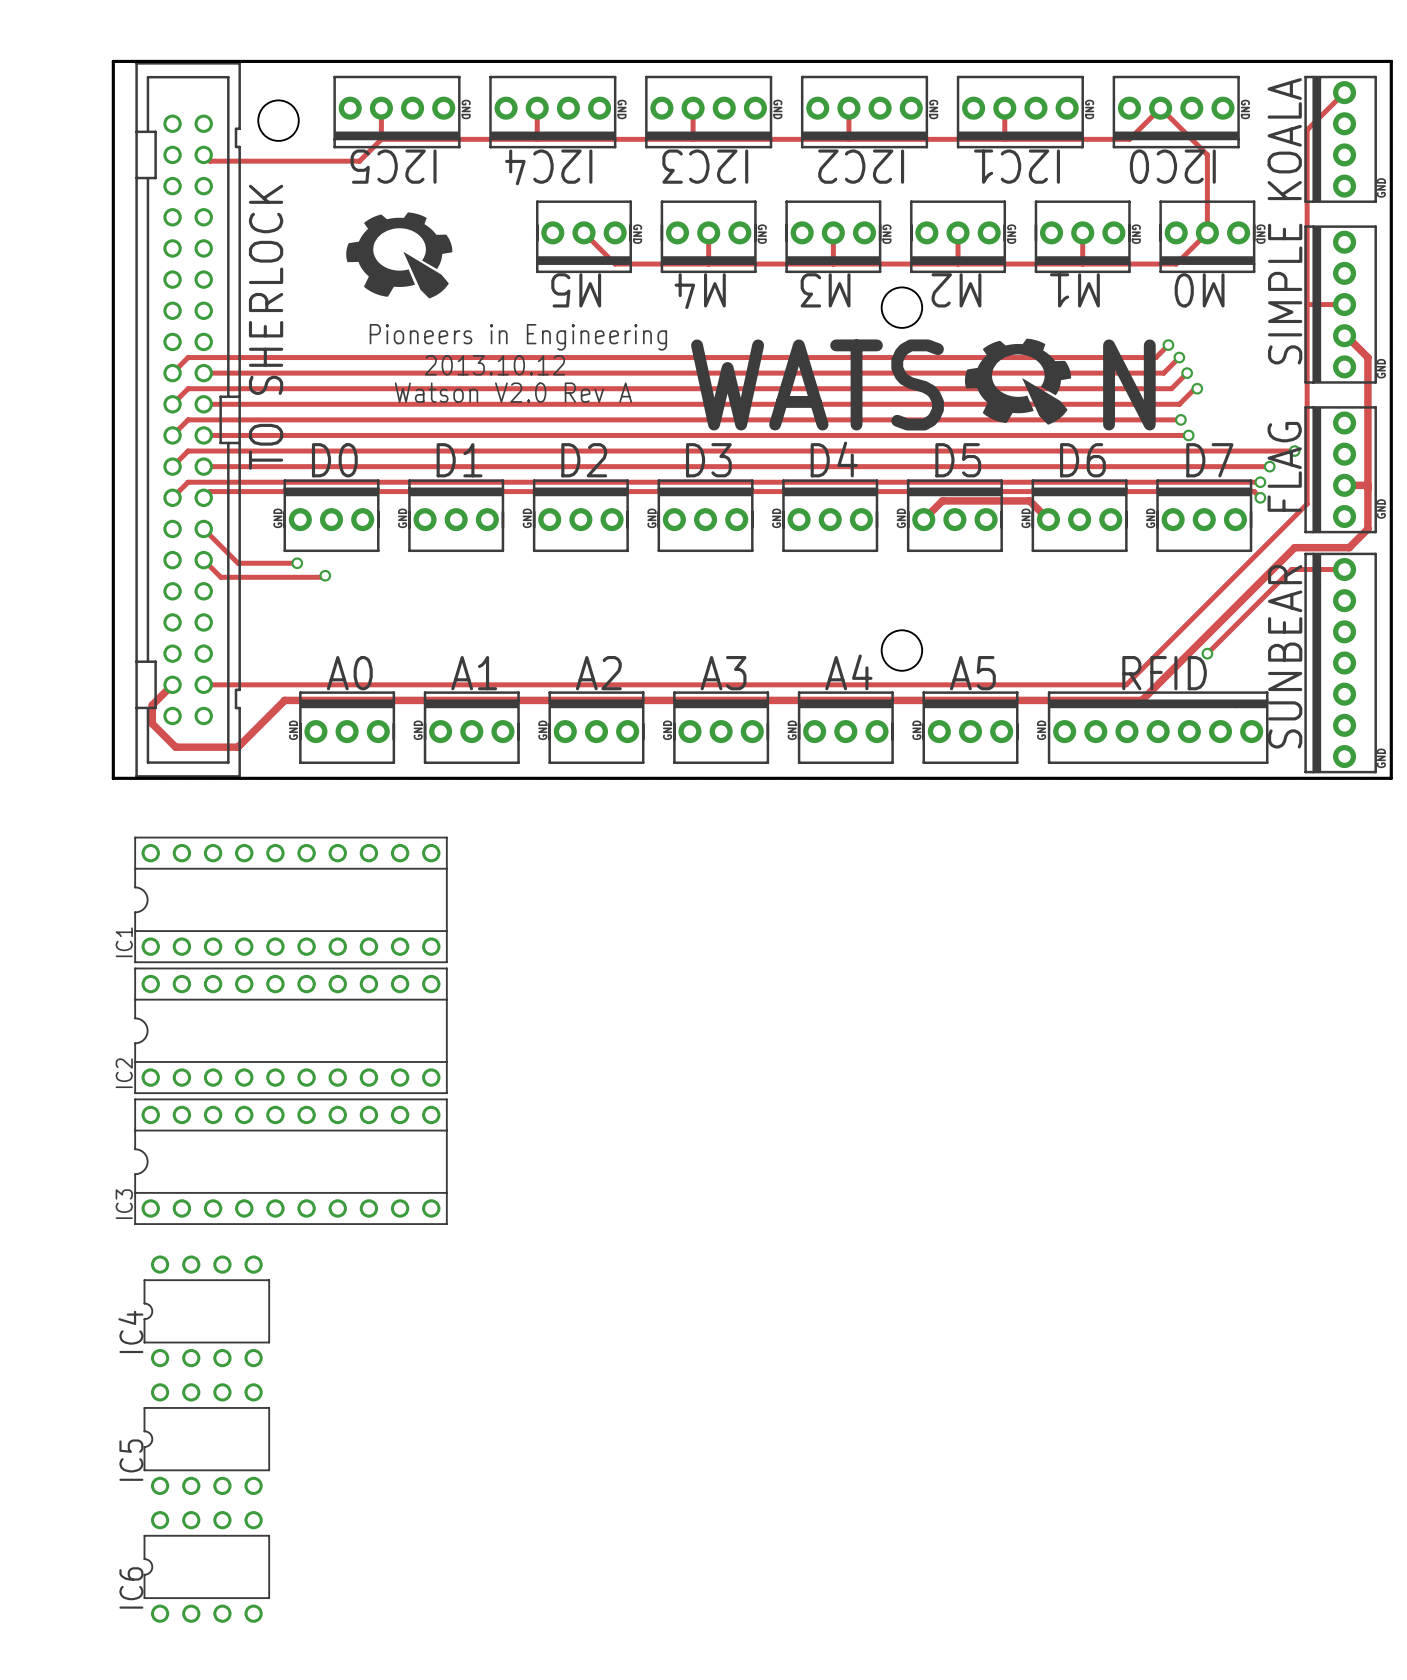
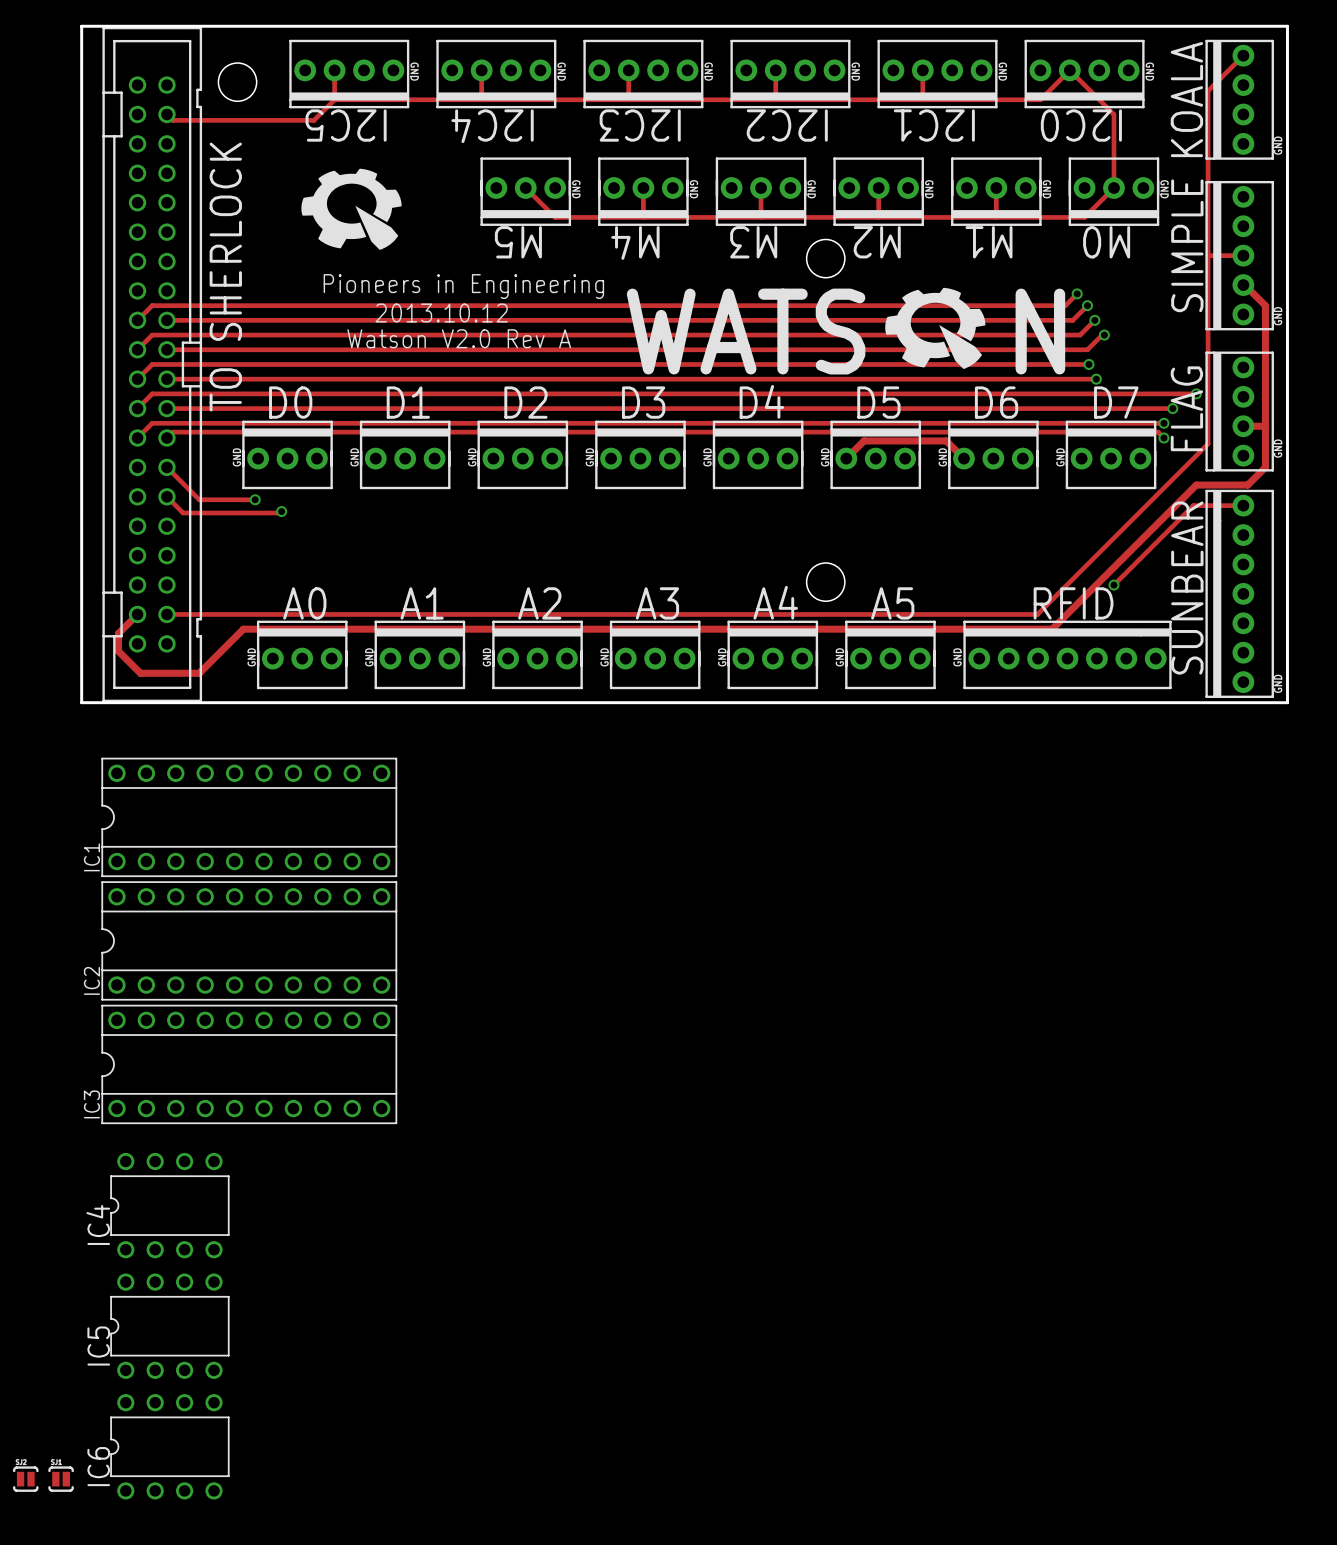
part: none -> (25, 1479)
part: none -> (61, 1479)

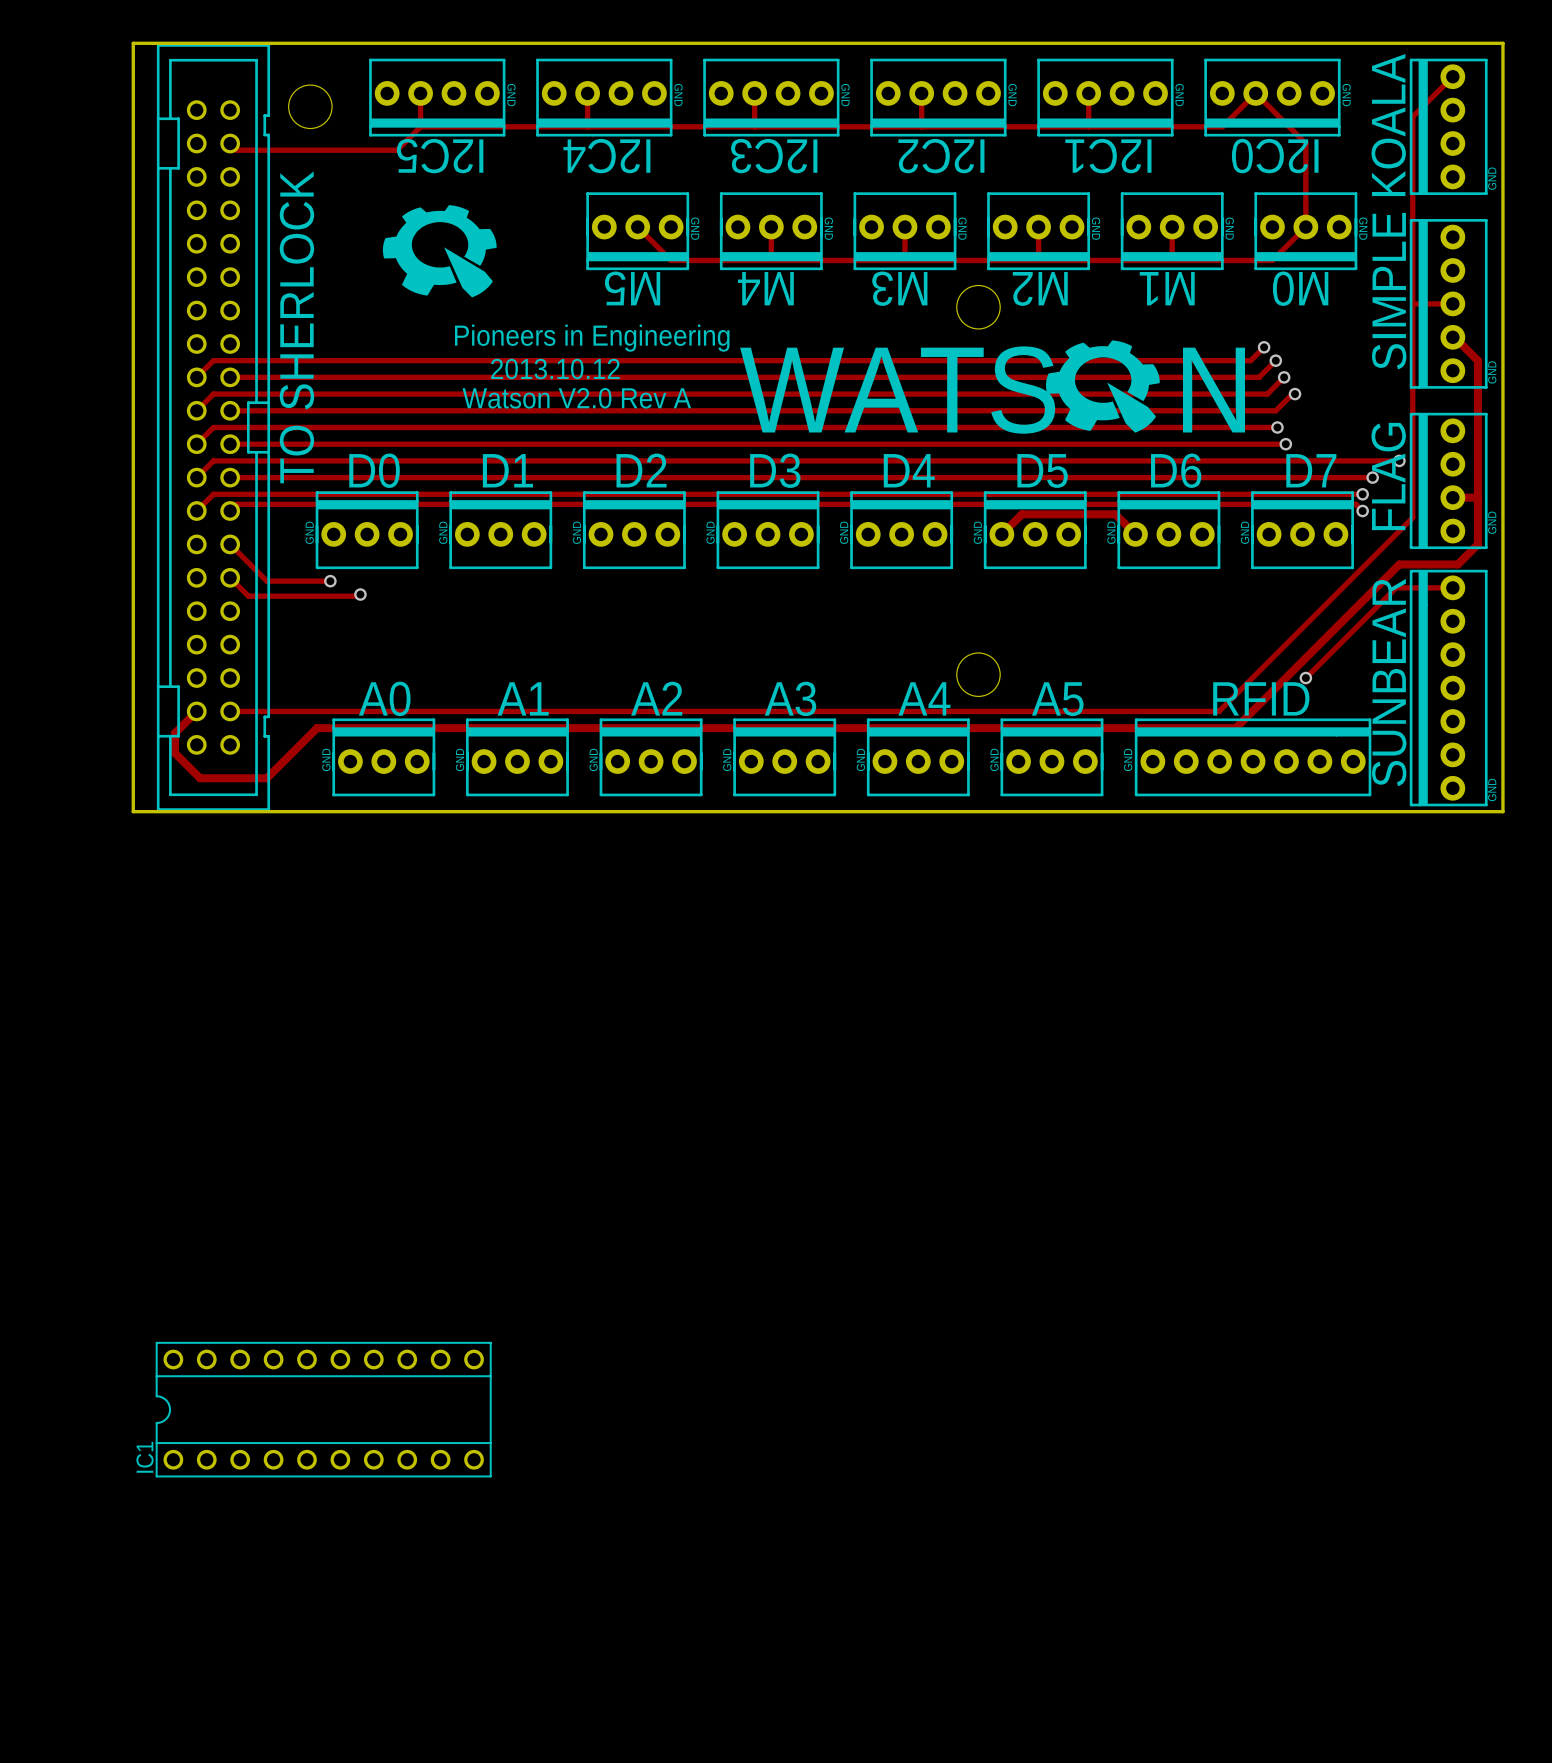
IC1 position: (249, 817) -> (323, 1409)
IC2: (249, 940) -> none
IC3: (249, 1064) -> none
IC4: (169, 1205) -> none
IC5: (169, 1326) -> none
IC6: (169, 1446) -> none
part: (25, 1479) -> none
part: (61, 1479) -> none

